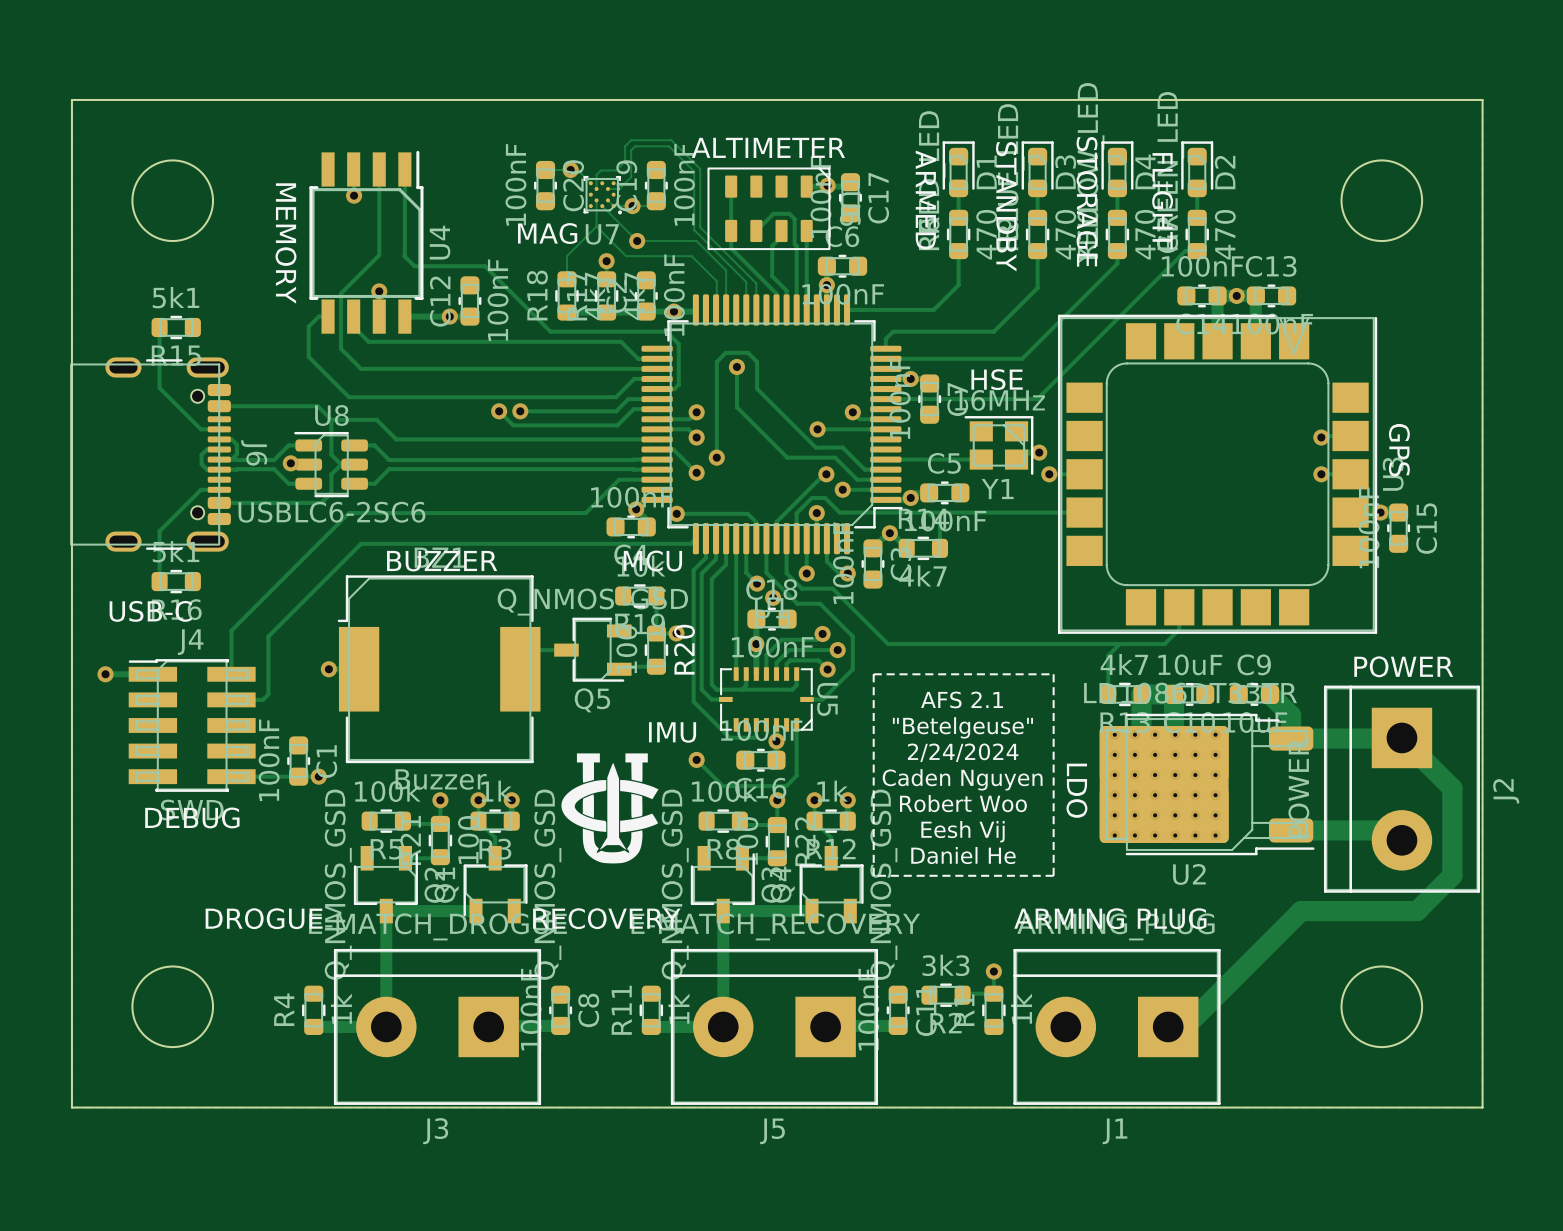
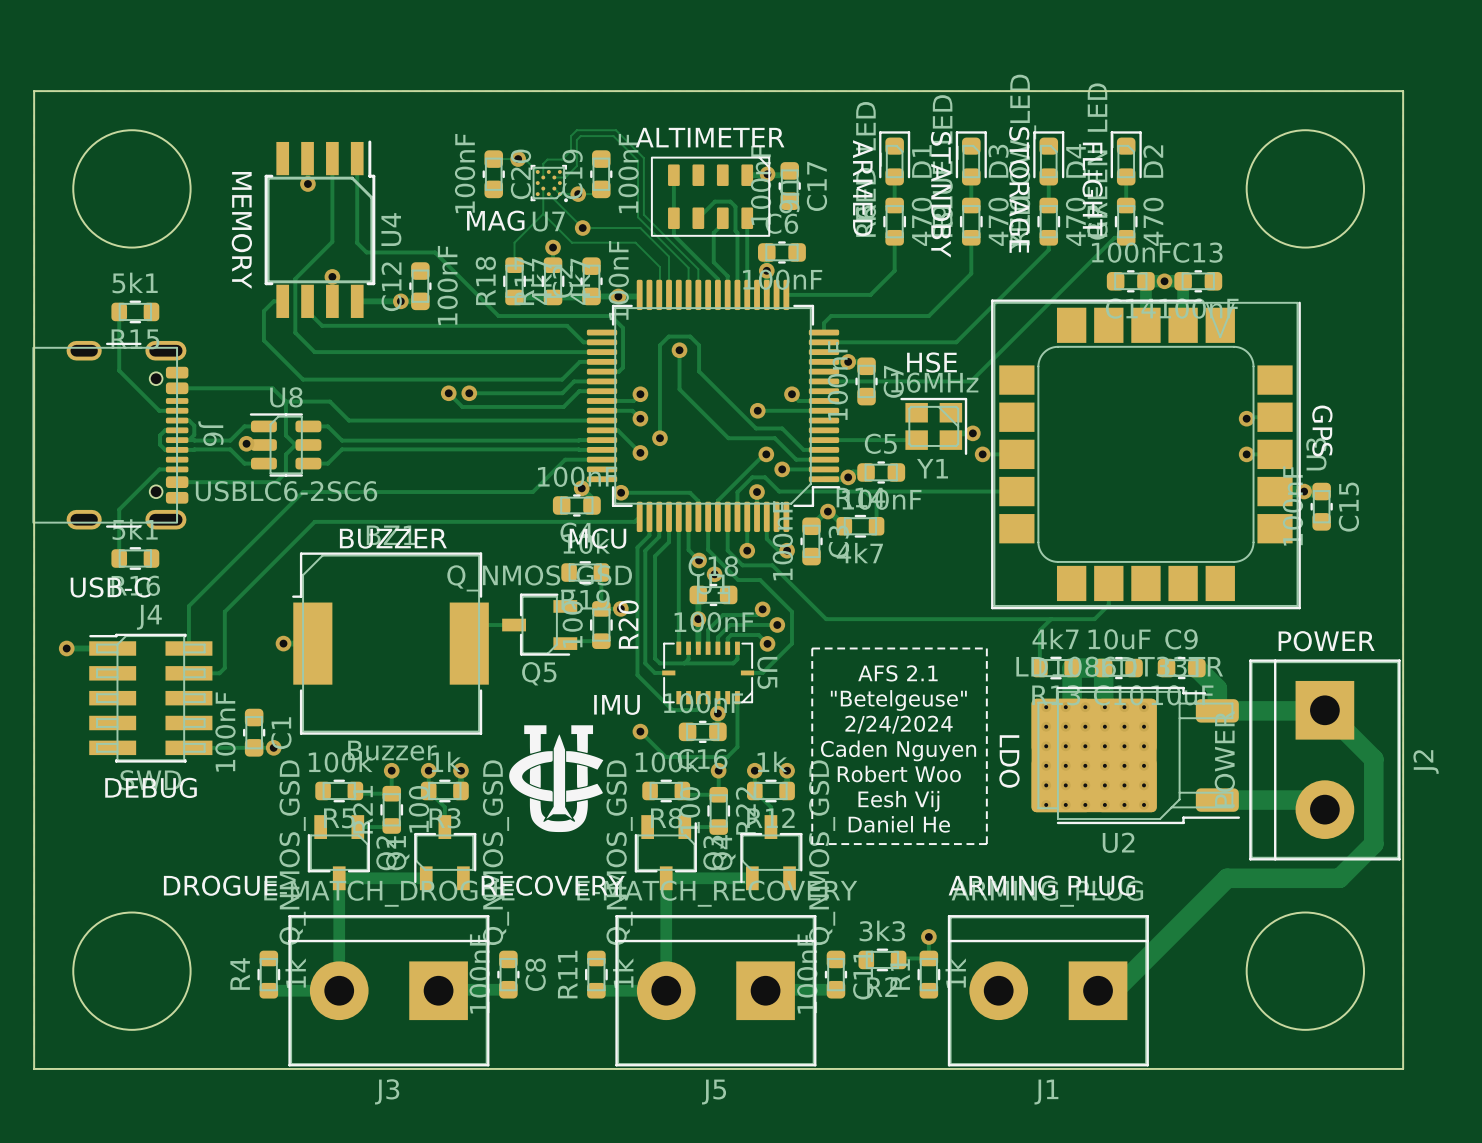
round board edge size: [131, 159, 215, 243] -> [72, 129, 192, 249]
round board edge size: [1340, 159, 1424, 243] -> [1245, 129, 1365, 249]
round board edge size: [131, 965, 215, 1049] -> [72, 911, 192, 1031]
round board edge size: [1340, 965, 1424, 1049] -> [1245, 911, 1365, 1031]

